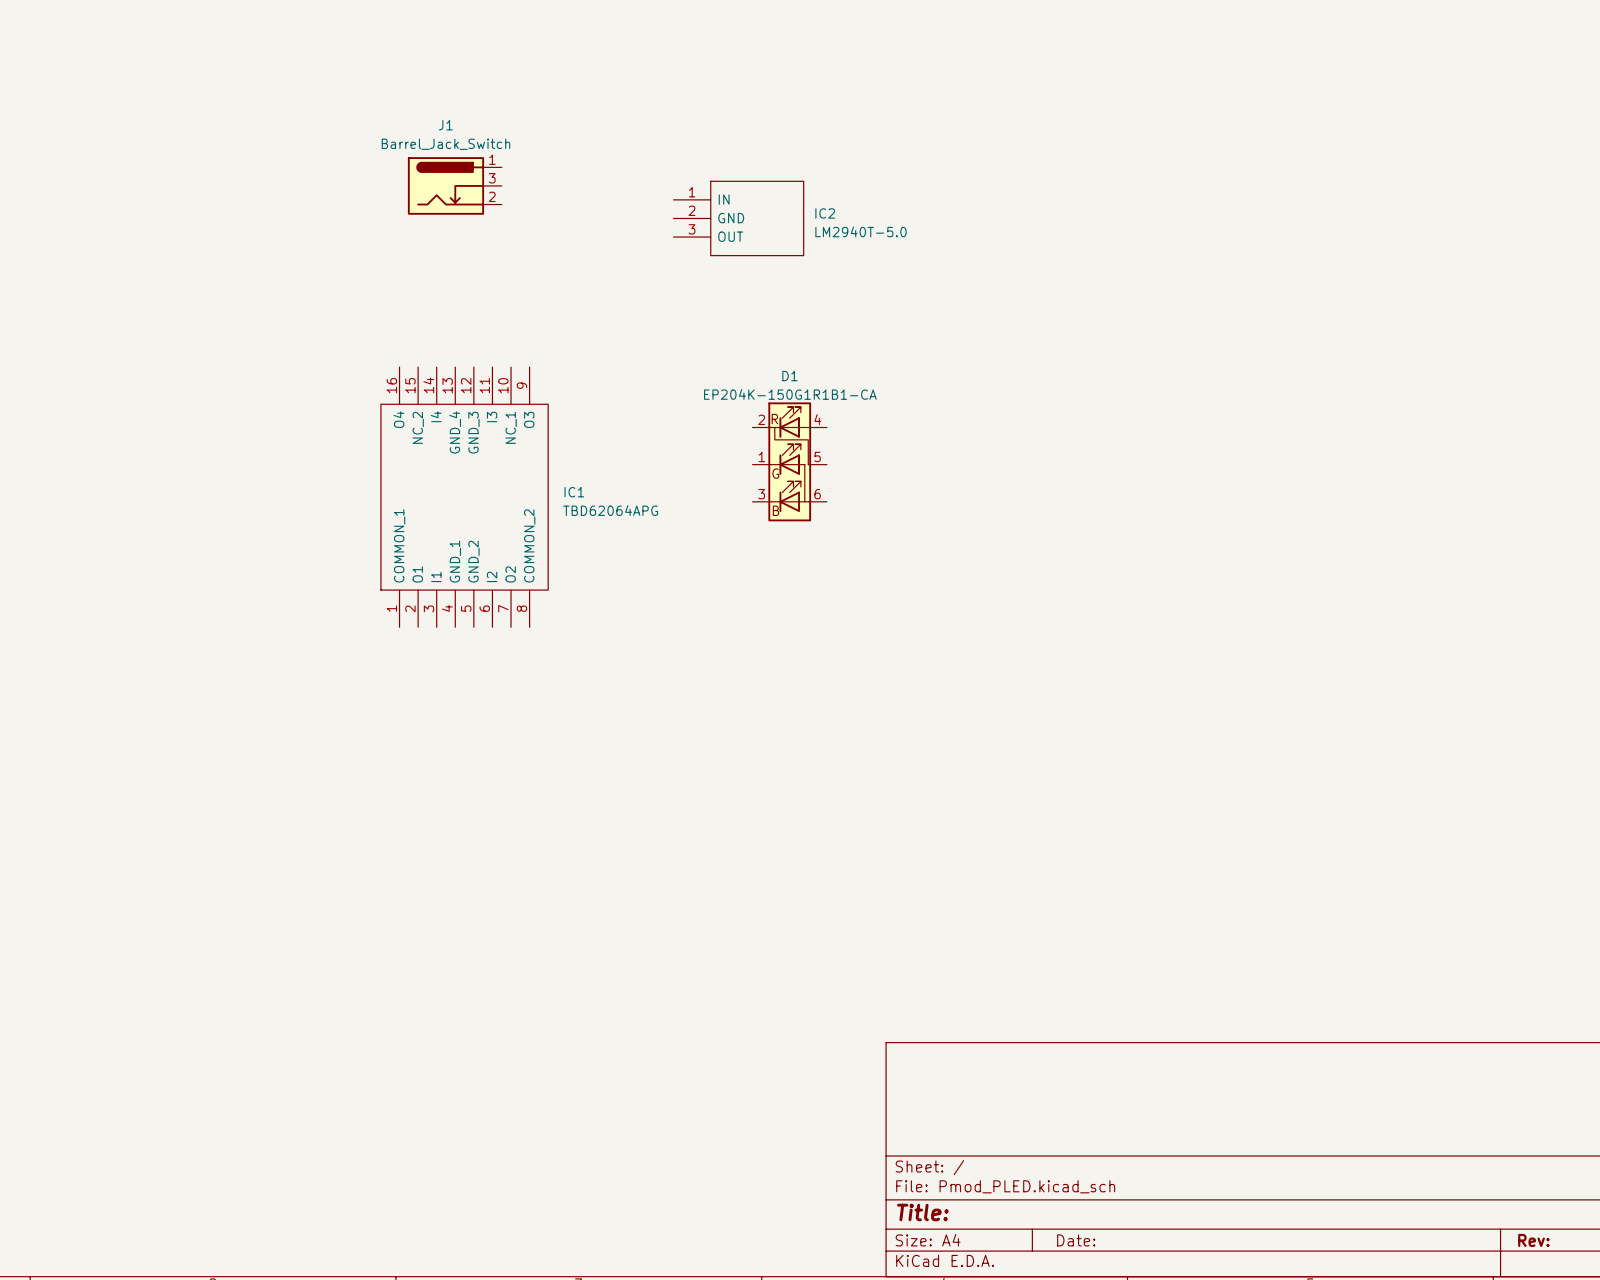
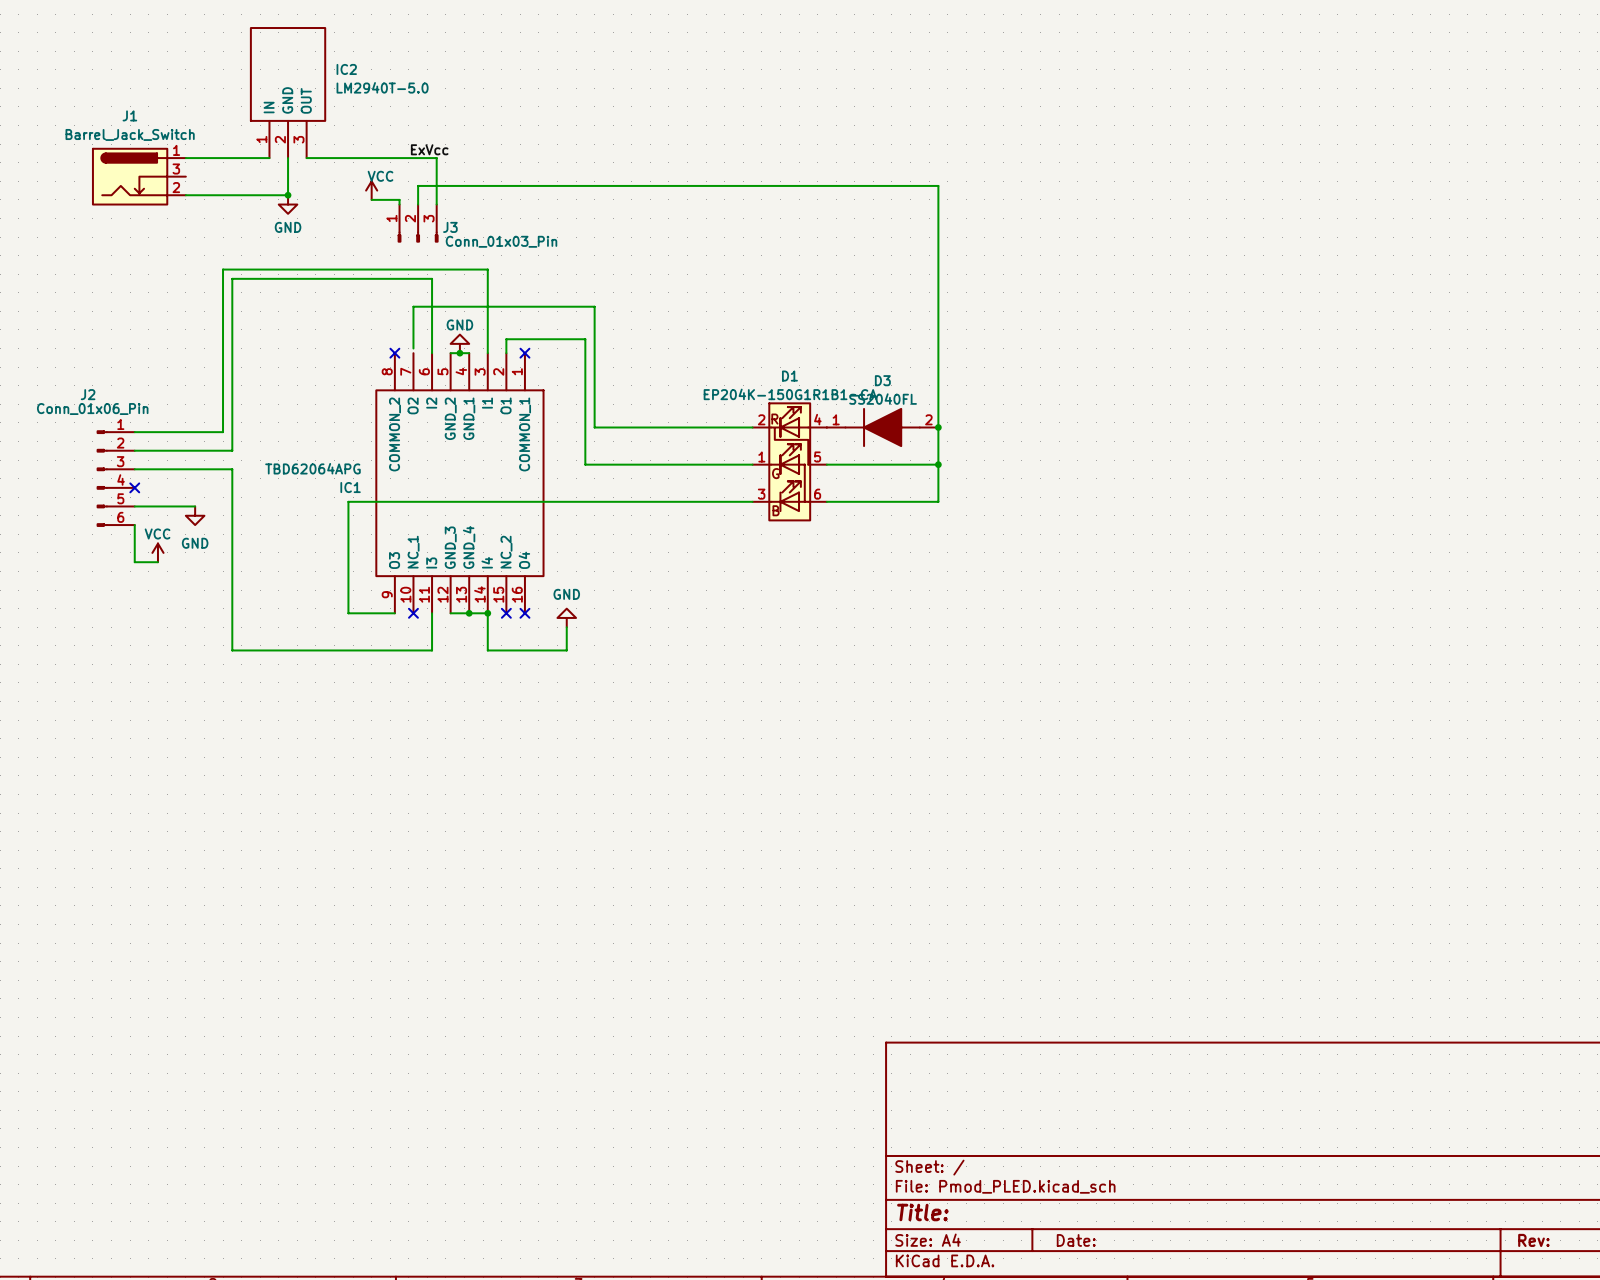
label: none -> ExVcc (429, 149)
wire: none -> (185, 158) (269, 158)
wire: none -> (288, 158) (288, 195) (185, 195)
wire: none -> (306, 158) (436, 158) (436, 204)
J1 position: (454, 185) -> (138, 176)
power symbol: none -> VCC (371, 190)
junction: none -> (288, 195)
wire: none -> (371, 199) (399, 199) (399, 204)
power symbol: none -> GND (288, 204)
wire: none -> (418, 204) (418, 185) (938, 185) (938, 501) (826, 501)
IC2 name position: IC2 (825, 213) -> IC2 (346, 69)
IC2 position: (738, 218) -> (288, 92)
IC2 rotation: 0° (757, 218) -> 90° counterclockwise (288, 74)
J3: none -> Conn_01x03_Pin (418, 223)
IC2 value position: LM2940T-5.0 (861, 231) -> LM2940T-5.0 (382, 87)
power symbol: none -> GND (459, 343)
wire: none -> (413, 348) (413, 306) (594, 306) (594, 427) (752, 427)
no-connect mark: none -> (394, 353)
wire: none -> (432, 353) (432, 278) (232, 278) (232, 450) (134, 450)
wire: none -> (450, 353) (469, 353)
junction: none -> (459, 353)
wire: none -> (487, 353) (487, 269) (223, 269) (223, 432) (134, 432)
wire: none -> (506, 353) (506, 339) (585, 339) (585, 464) (752, 464)
no-connect mark: none -> (524, 353)
D3: none -> SS2040FL (882, 427)
junction: none -> (938, 427)
wire: none -> (826, 464) (938, 464)
junction: none -> (938, 464)
wire: none -> (134, 469) (232, 469) (232, 650) (432, 650) (432, 613)
J2: none -> Conn_01x06_Pin (115, 478)
no-connect mark: none -> (134, 487)
IC1 rotation: 0° (464, 497) -> 180° (459, 483)
wire: none -> (752, 501) (348, 501) (348, 613) (394, 613)
wire: none -> (134, 506) (195, 506)
power symbol: none -> GND (195, 515)
wire: none -> (134, 525) (134, 562) (157, 562)
power symbol: none -> VCC (157, 552)
no-connect mark: none -> (413, 613)
wire: none -> (450, 613) (487, 613) (487, 650) (566, 650) (566, 627)
junction: none -> (469, 613)
junction: none -> (487, 613)
no-connect mark: none -> (506, 613)
no-connect mark: none -> (524, 613)
power symbol: none -> GND (566, 617)

